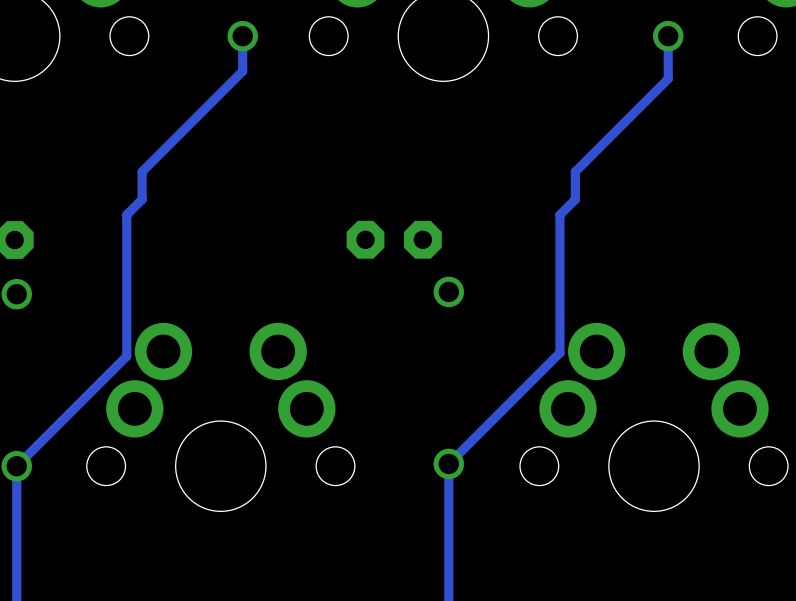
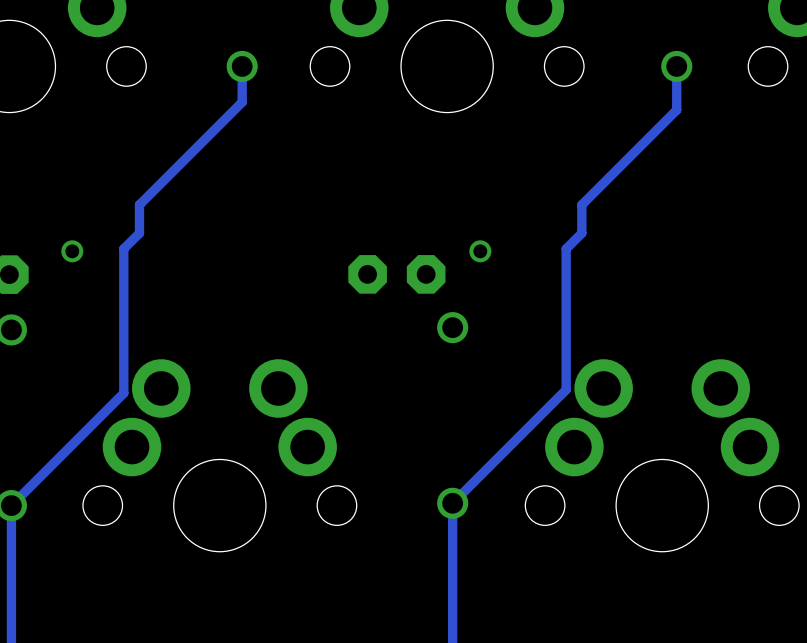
via: none -> (72, 251)
via: none -> (480, 251)

